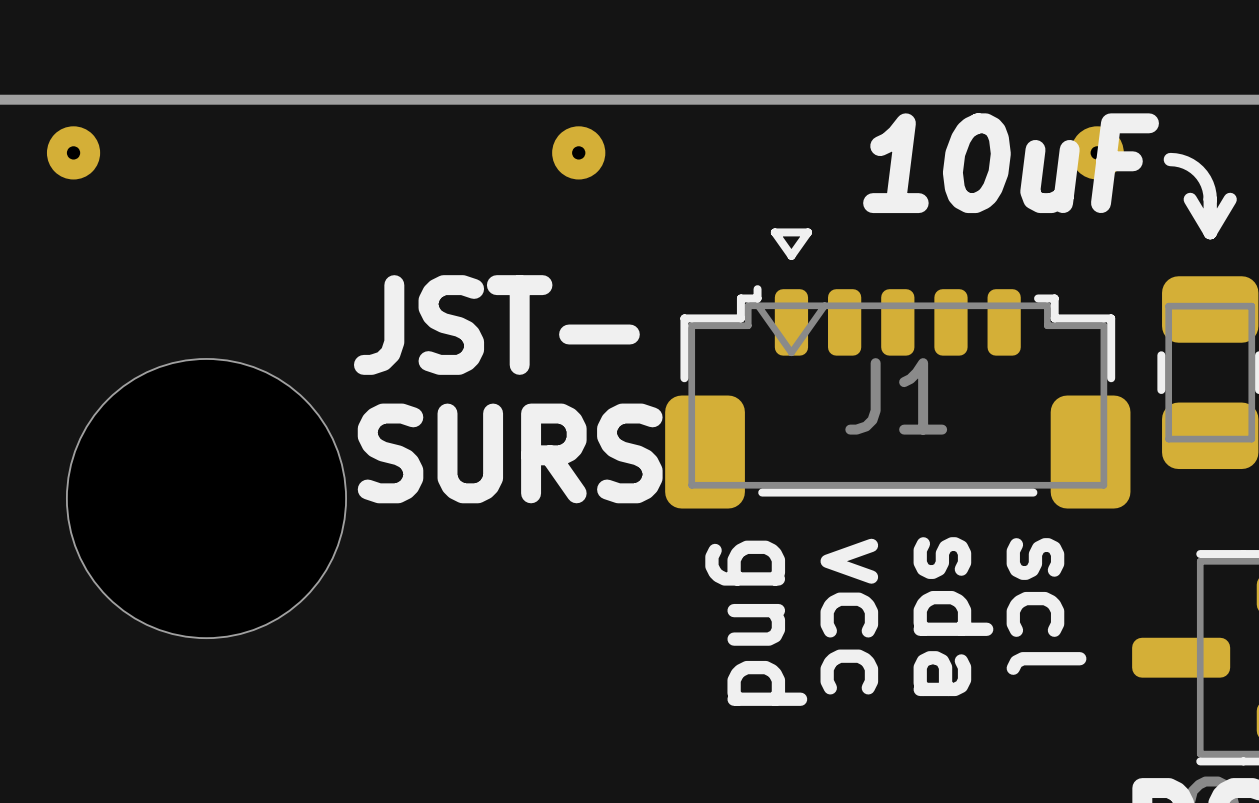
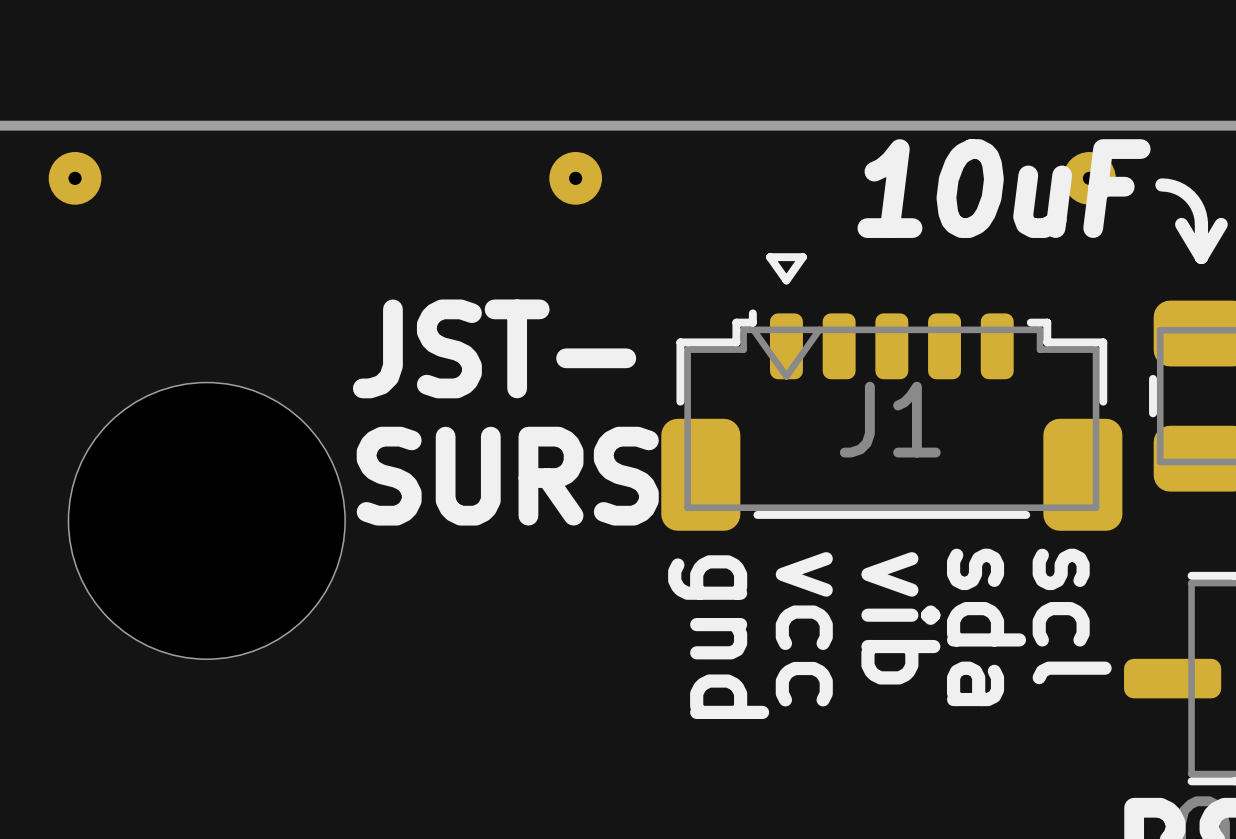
text: none -> vib (900, 618)
text position: scl (1046, 606) -> scl (1072, 616)
text position: vcc (849, 616) -> vcc (804, 629)
text position: sda (953, 616) -> sda (986, 627)
text position: gnd (756, 623) -> gnd (718, 637)

